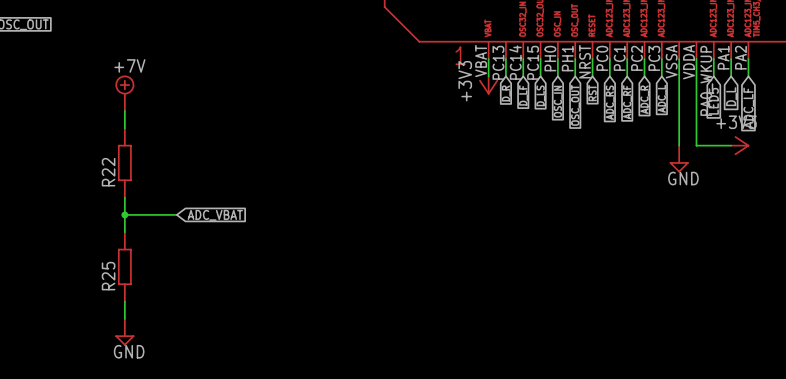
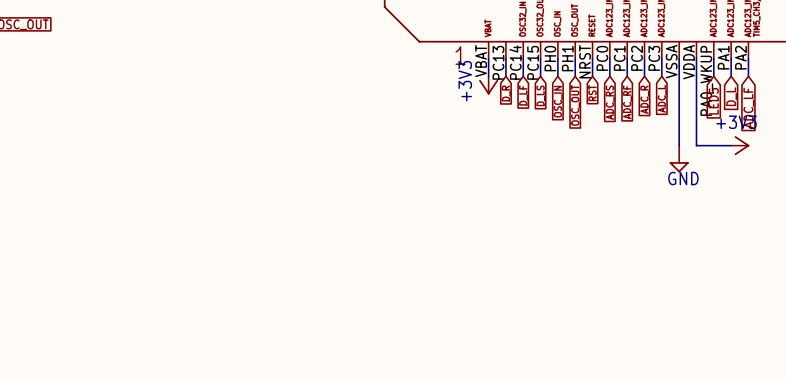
power symbol: +7V (124, 93) -> none
wire: (124, 110) (124, 128) -> none
R22: (124, 162) -> none
wire: (124, 197) (124, 232) -> none
wire: (124, 214) (176, 214) -> none
junction: (124, 214) -> none
global label: ADC_VBAT (215, 215) -> none
R25: (124, 266) -> none
wire: (124, 301) (124, 318) -> none
power symbol: GND (124, 332) -> none

